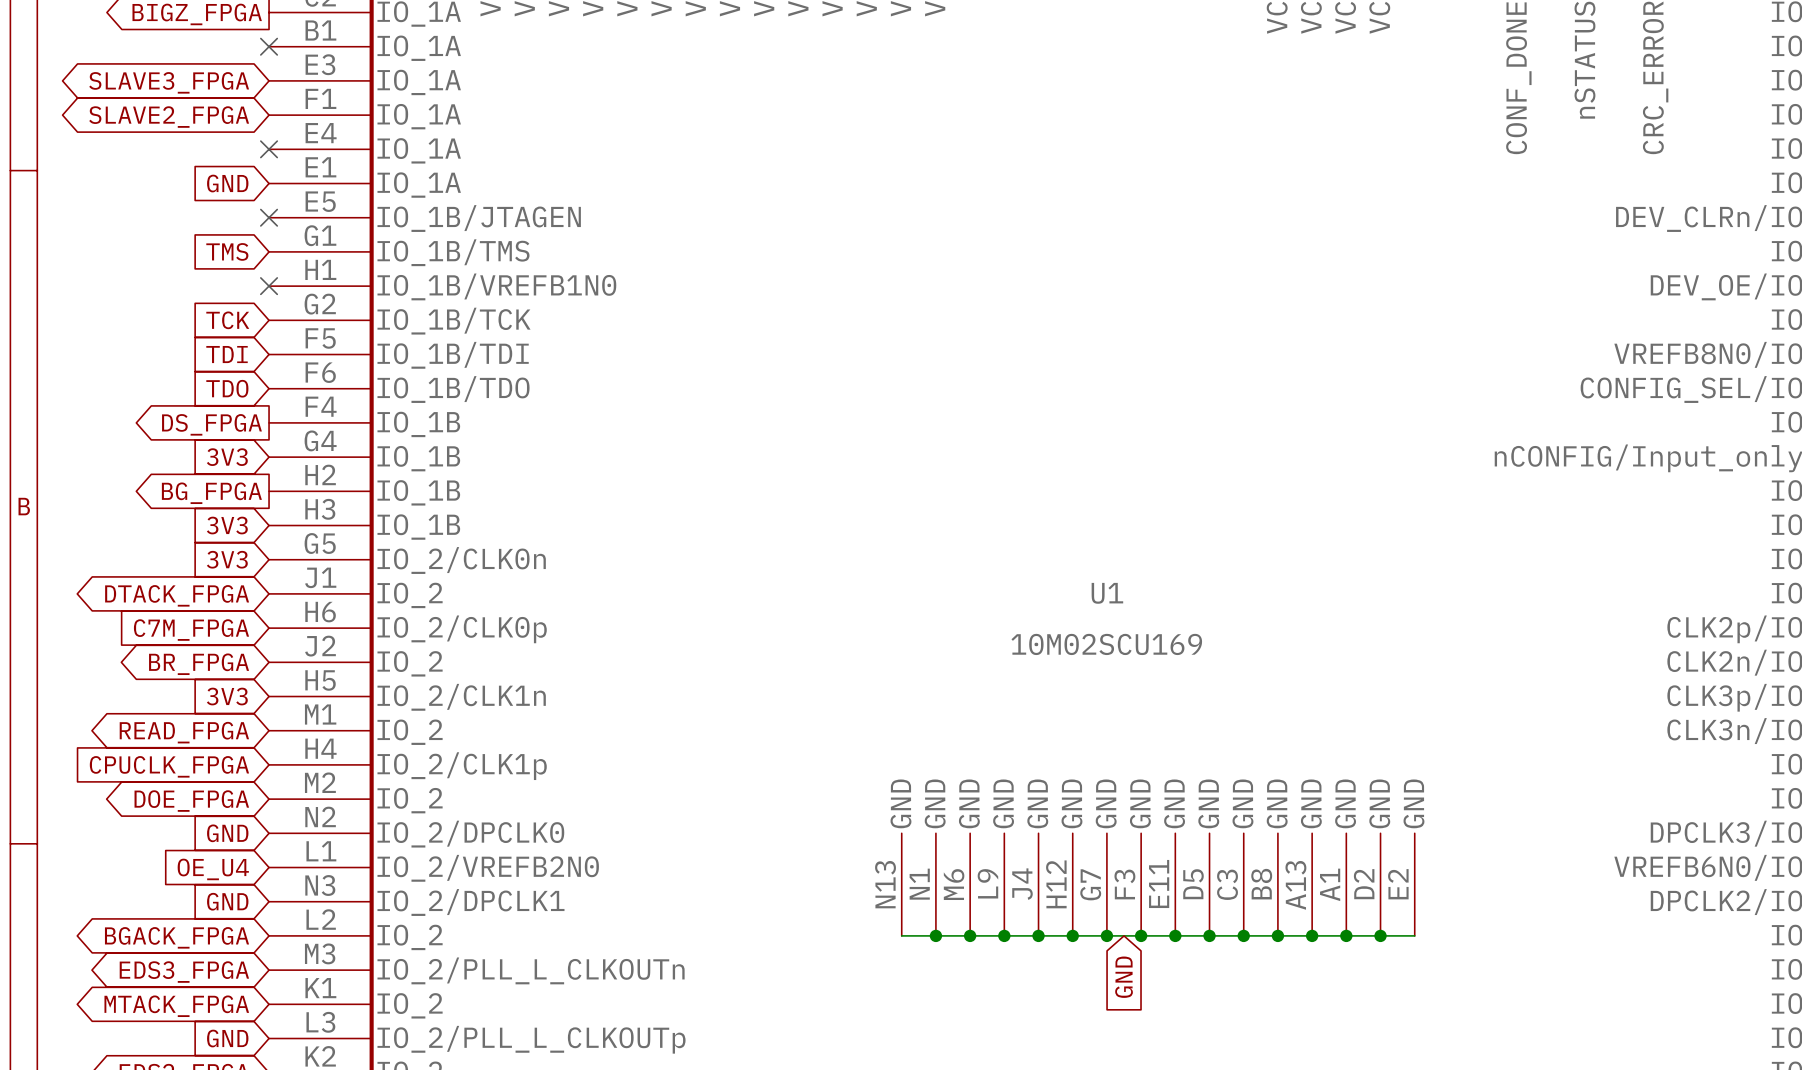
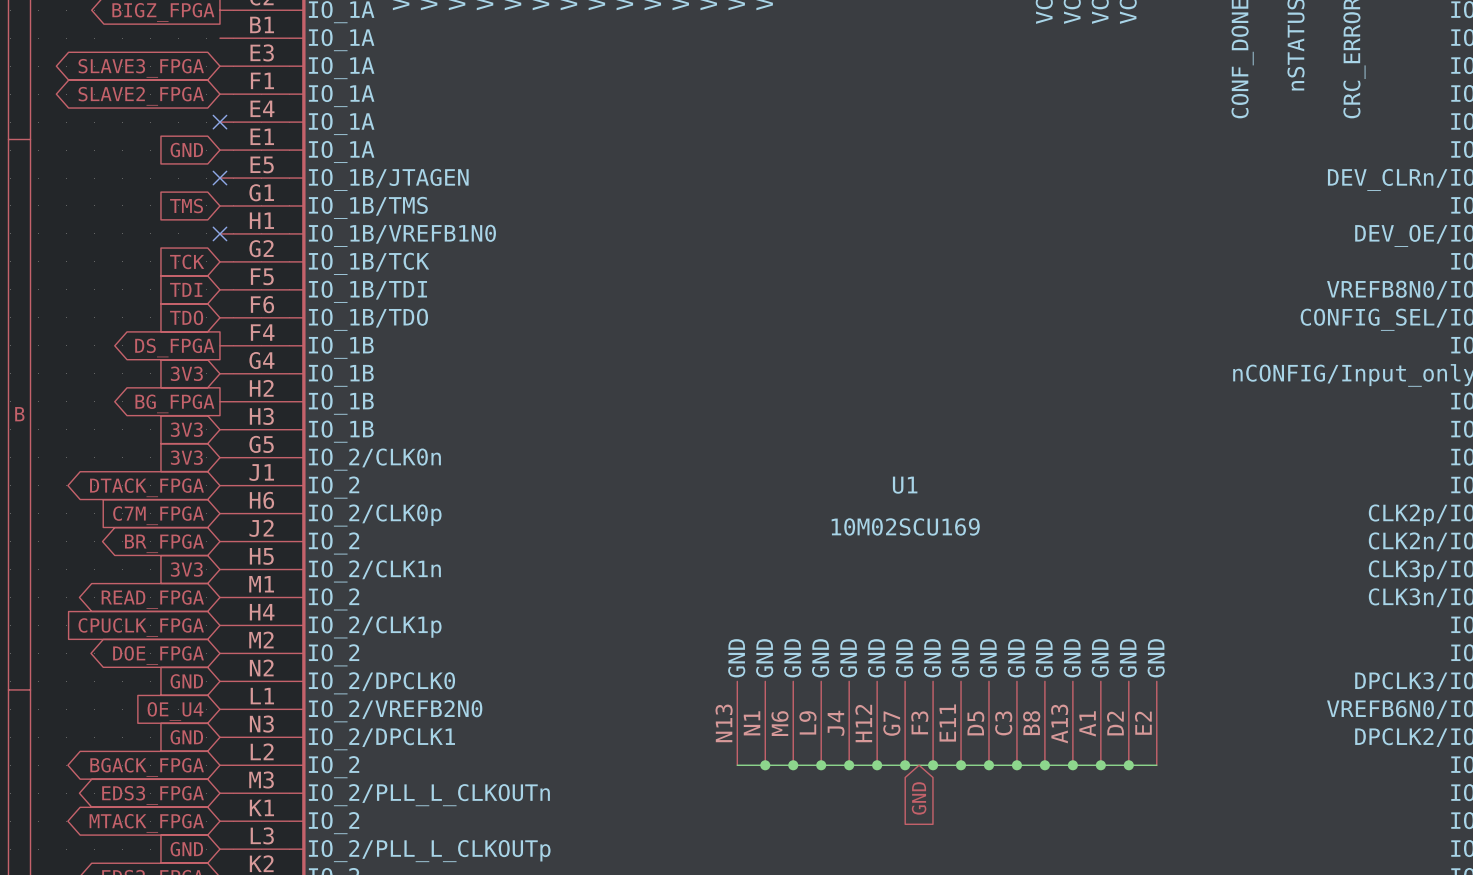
no-connect mark: (269, 46) -> none

